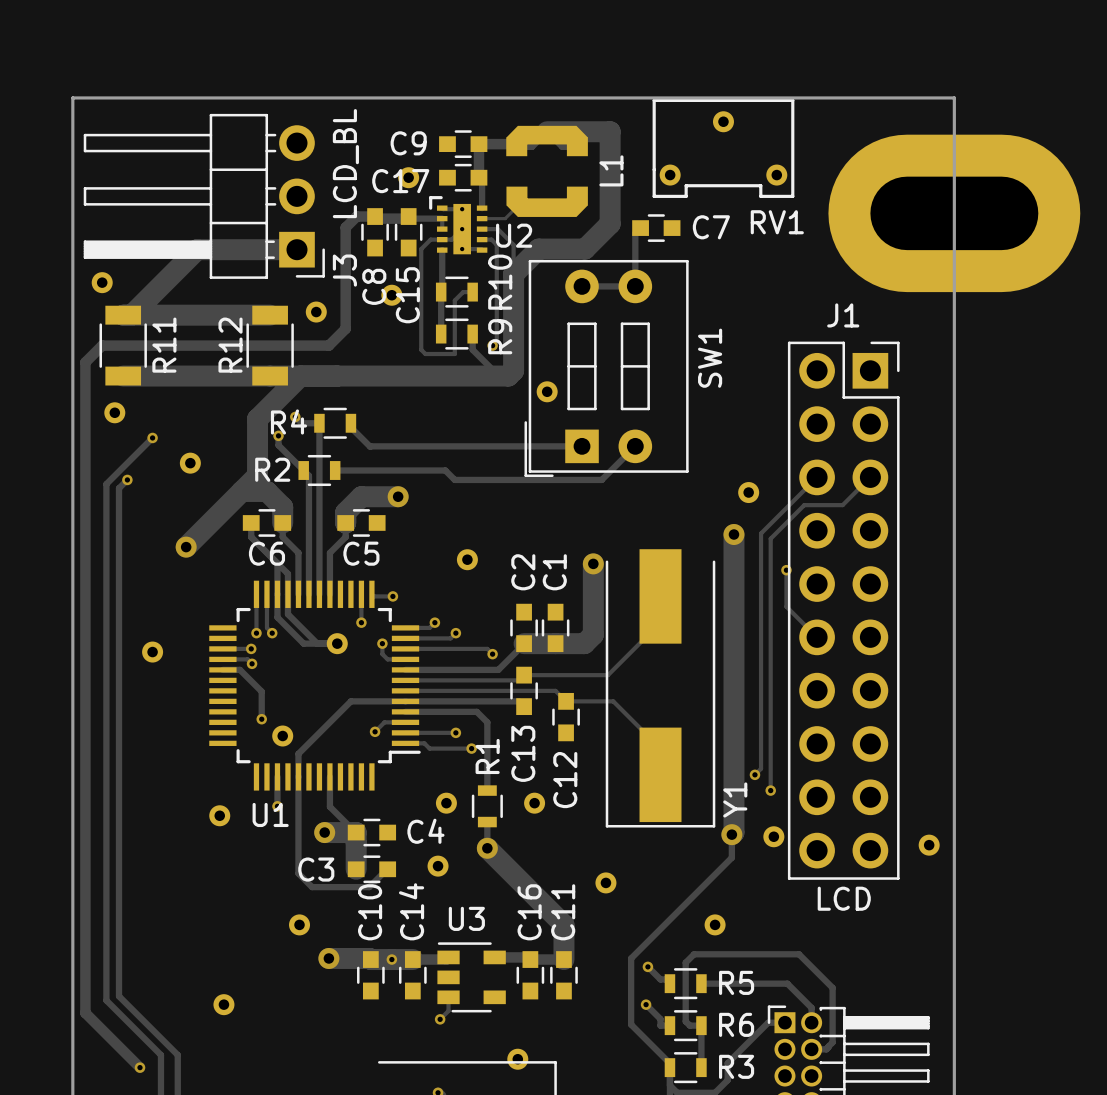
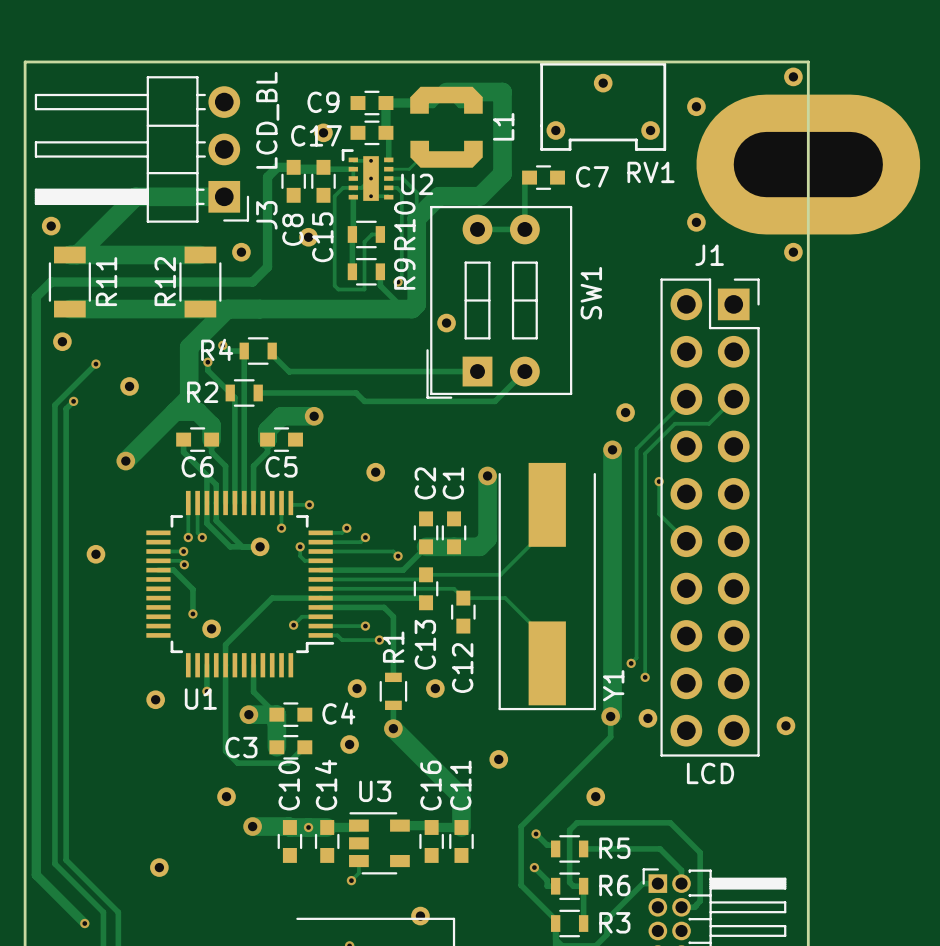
part: none -> (793, 76)
part: none -> (696, 106)
part: none -> (696, 222)
part: none -> (793, 252)

